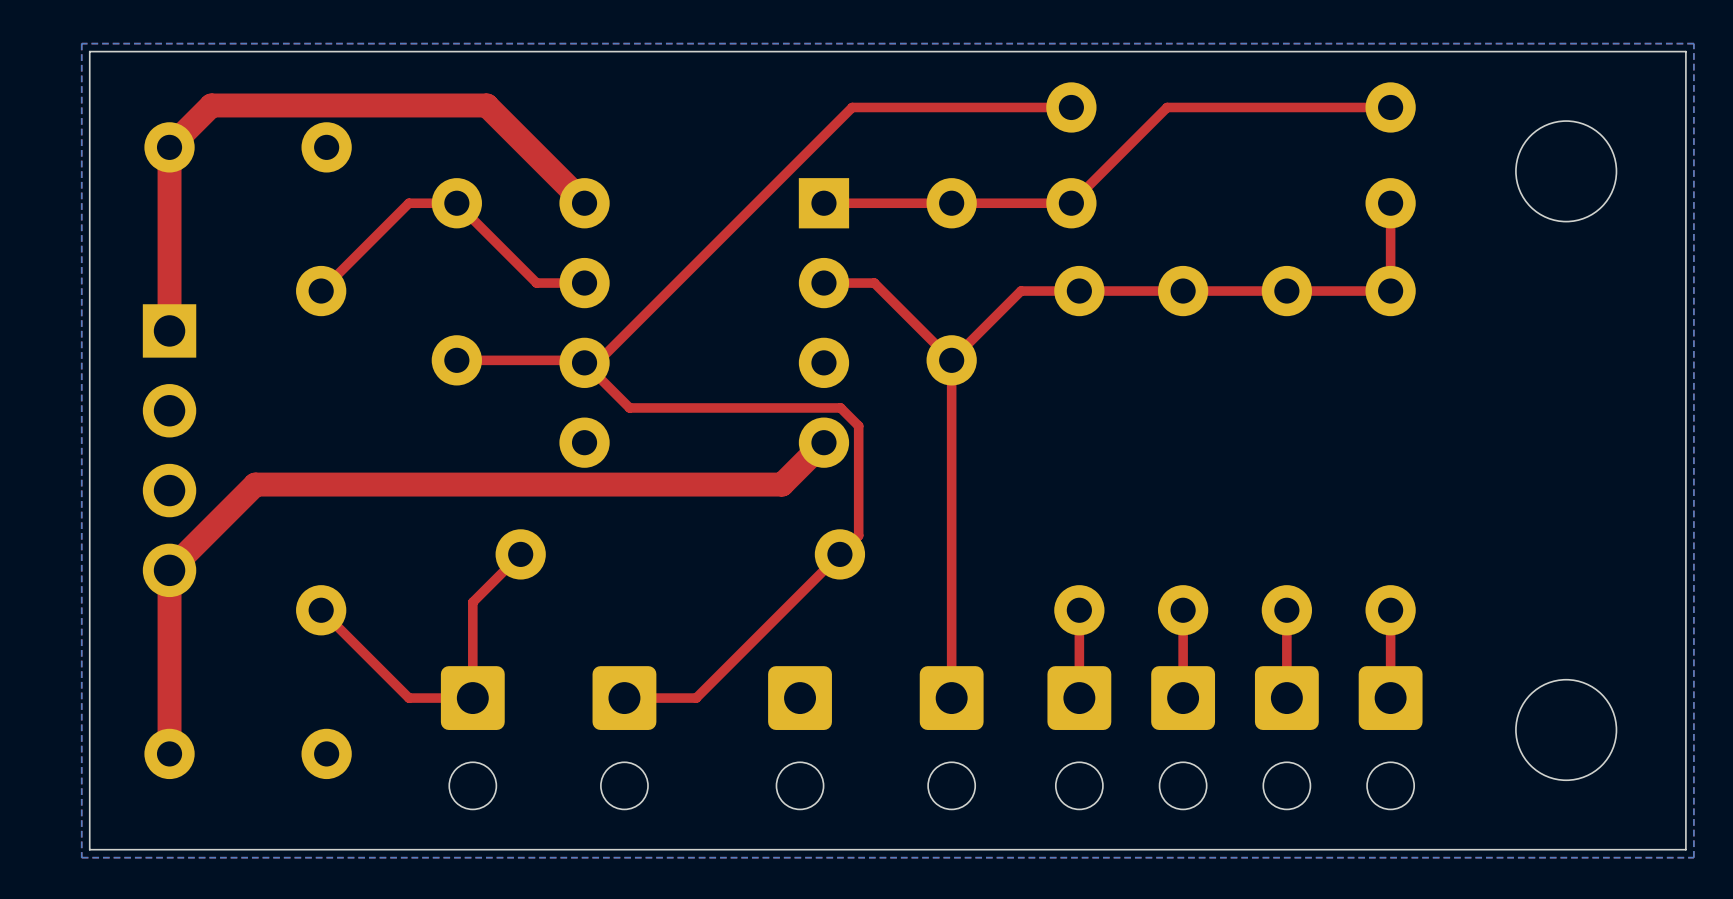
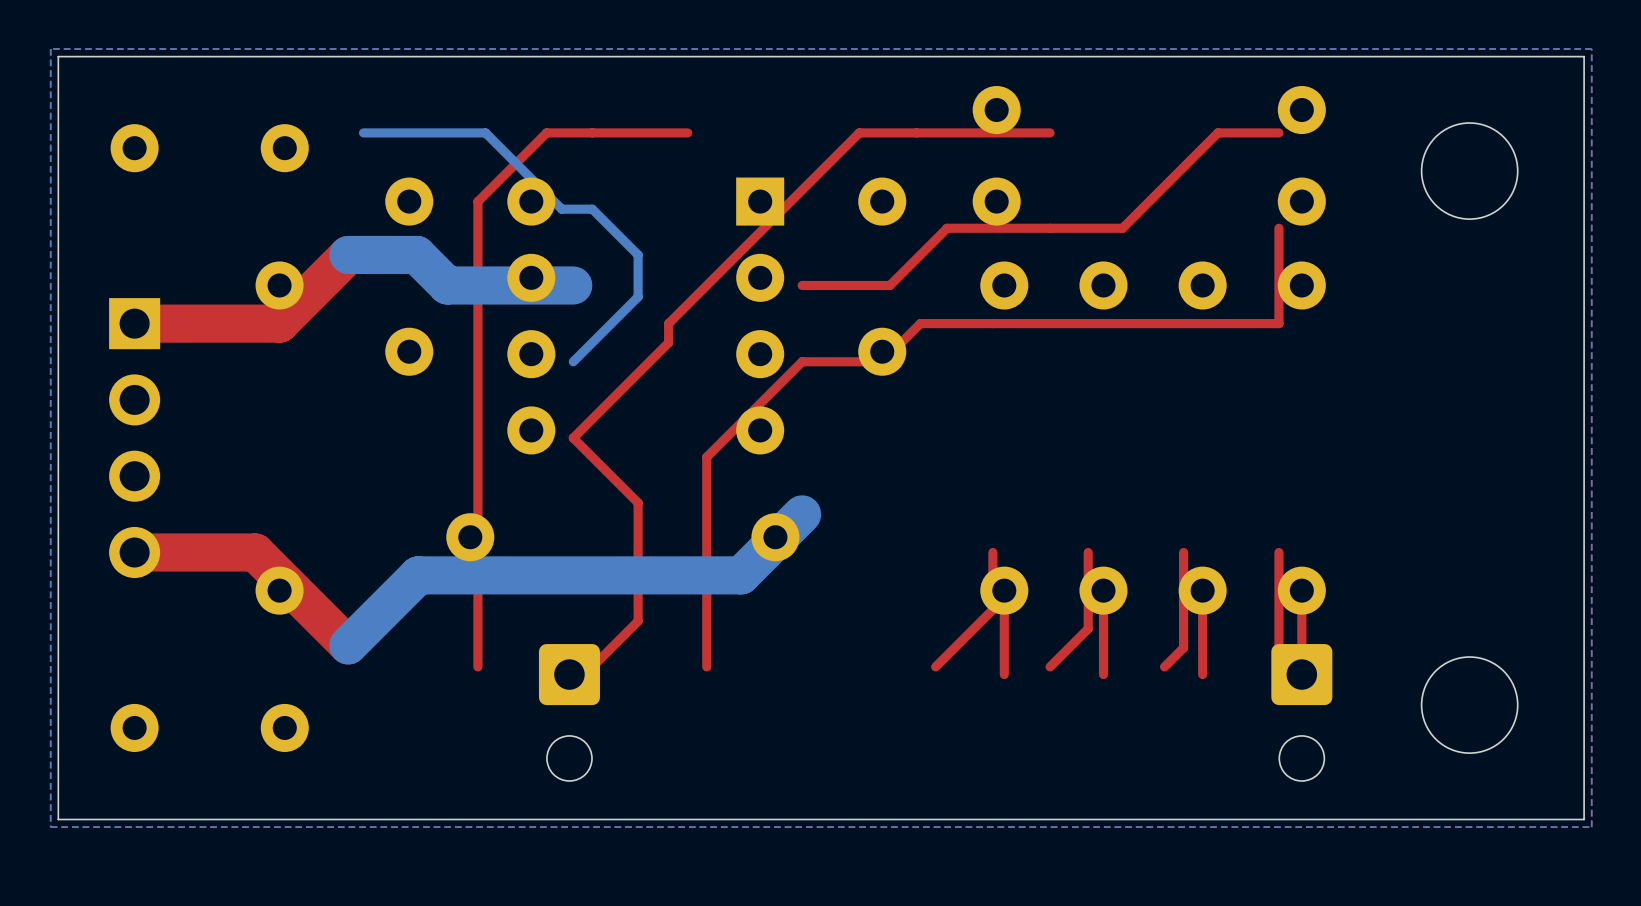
top track: (1071, 107) (852, 107) (596, 362) (584, 362) -> none
top track: (1390, 107) (1167, 107) (1071, 203) (823, 203) -> none
bottom track: none -> (363, 132) (485, 132) (561, 209) (592, 209) (638, 254) (638, 296) (573, 361)
top track: none -> (687, 132) (546, 132) (477, 201) (477, 666)
top track: none -> (1050, 132) (859, 132) (668, 323) (668, 342) (573, 438) (638, 502) (638, 621) (592, 666)
top track: none -> (1278, 132) (1217, 132) (1122, 228) (947, 228) (889, 285) (802, 285)
top track: (584, 203) (486, 105) (211, 105) (169, 147) (169, 330) -> none
top track: (1390, 203) (1390, 291) (1020, 291) (951, 360) -> none
top track: none -> (1278, 228) (1278, 323) (920, 323) (882, 361) (802, 361) (706, 457) (706, 666)
top track: none -> (348, 254) (279, 323) (149, 323)
bottom track: none -> (348, 254) (416, 254) (447, 285) (573, 285)
top track: (584, 283) (536, 283) (456, 203) (408, 203) (321, 291) -> none
top track: (823, 283) (874, 283) (951, 360) -> none
top track: (456, 360) (582, 360) (629, 407) (840, 407) (858, 426) (858, 535) (696, 698) (624, 698) -> none
top track: (951, 360) (951, 698) -> none
top track: (823, 442) (782, 484) (255, 484) (169, 570) (169, 753) -> none
bottom track: none -> (802, 514) (741, 575) (418, 575) (348, 645)
top track: (520, 554) (472, 602) (472, 698) (408, 698) (321, 610) -> none
top track: none -> (149, 552) (255, 552) (348, 645)
top track: none -> (992, 552) (992, 609) (935, 666)
top track: none -> (1088, 552) (1088, 628) (1050, 666)
top track: none -> (1183, 552) (1183, 647) (1164, 666)
top track: none -> (1278, 552) (1278, 666)
part: (472, 737) -> none
part: (800, 737) -> none
part: (951, 737) -> none
part: (1079, 737) -> none
part: (1183, 737) -> none
part: (1286, 737) -> none

